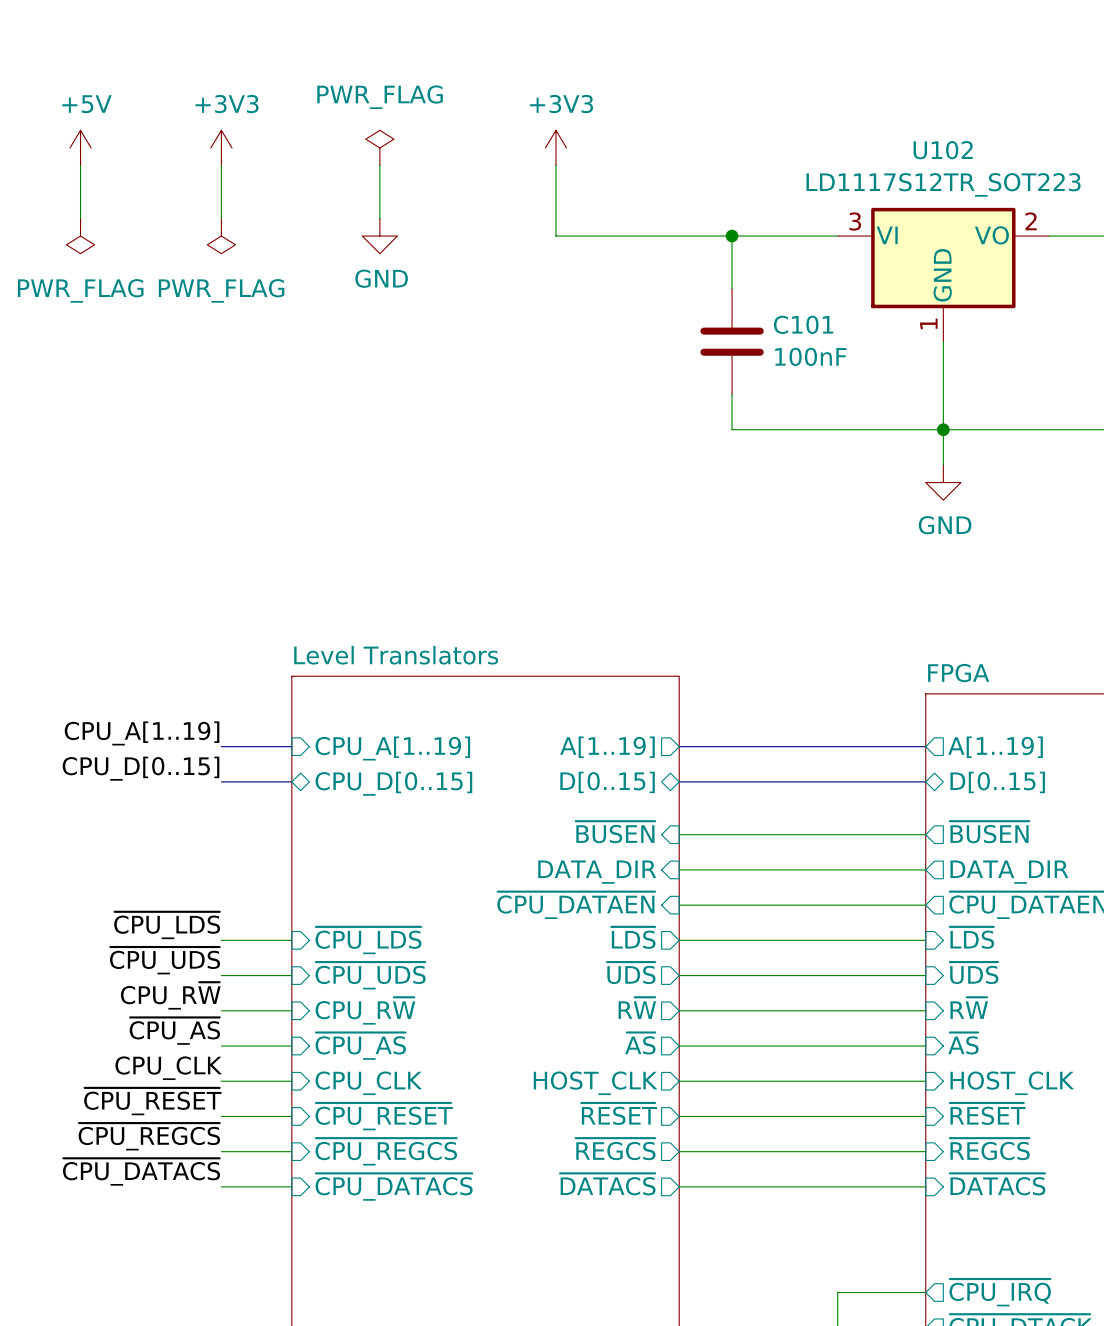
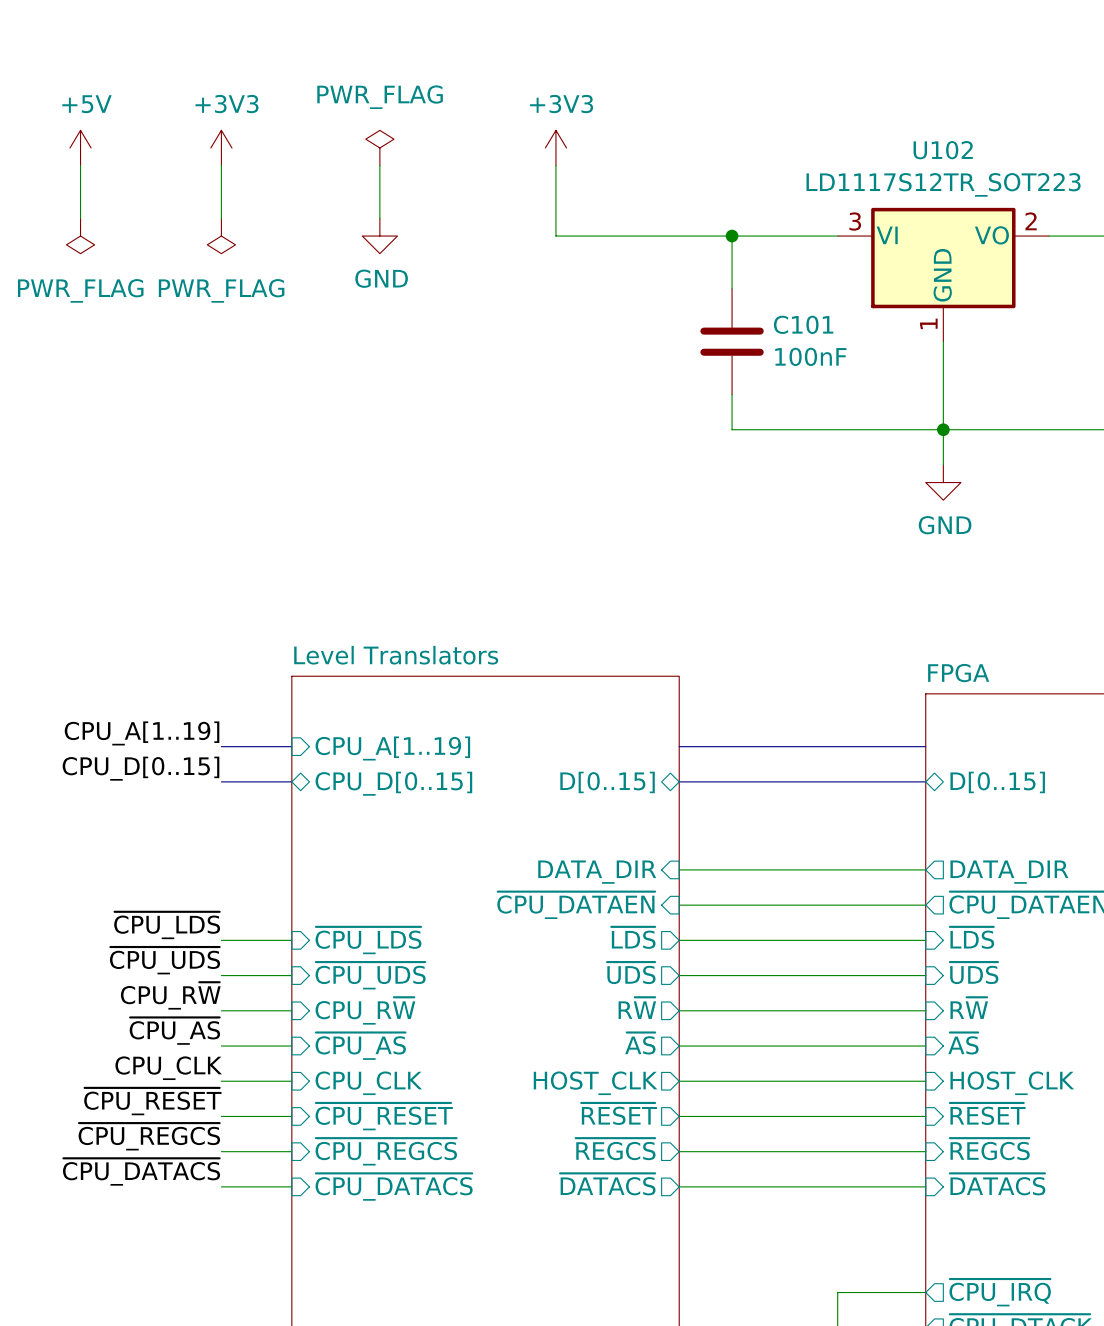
sheet pin: A[1..19] (607, 747) -> none
sheet pin: A[1..19] (995, 747) -> none
sheet pin: ~{BUSEN} (615, 832) -> none
sheet pin: ~{BUSEN} (989, 832) -> none
wire: (679, 834) (925, 834) -> none

